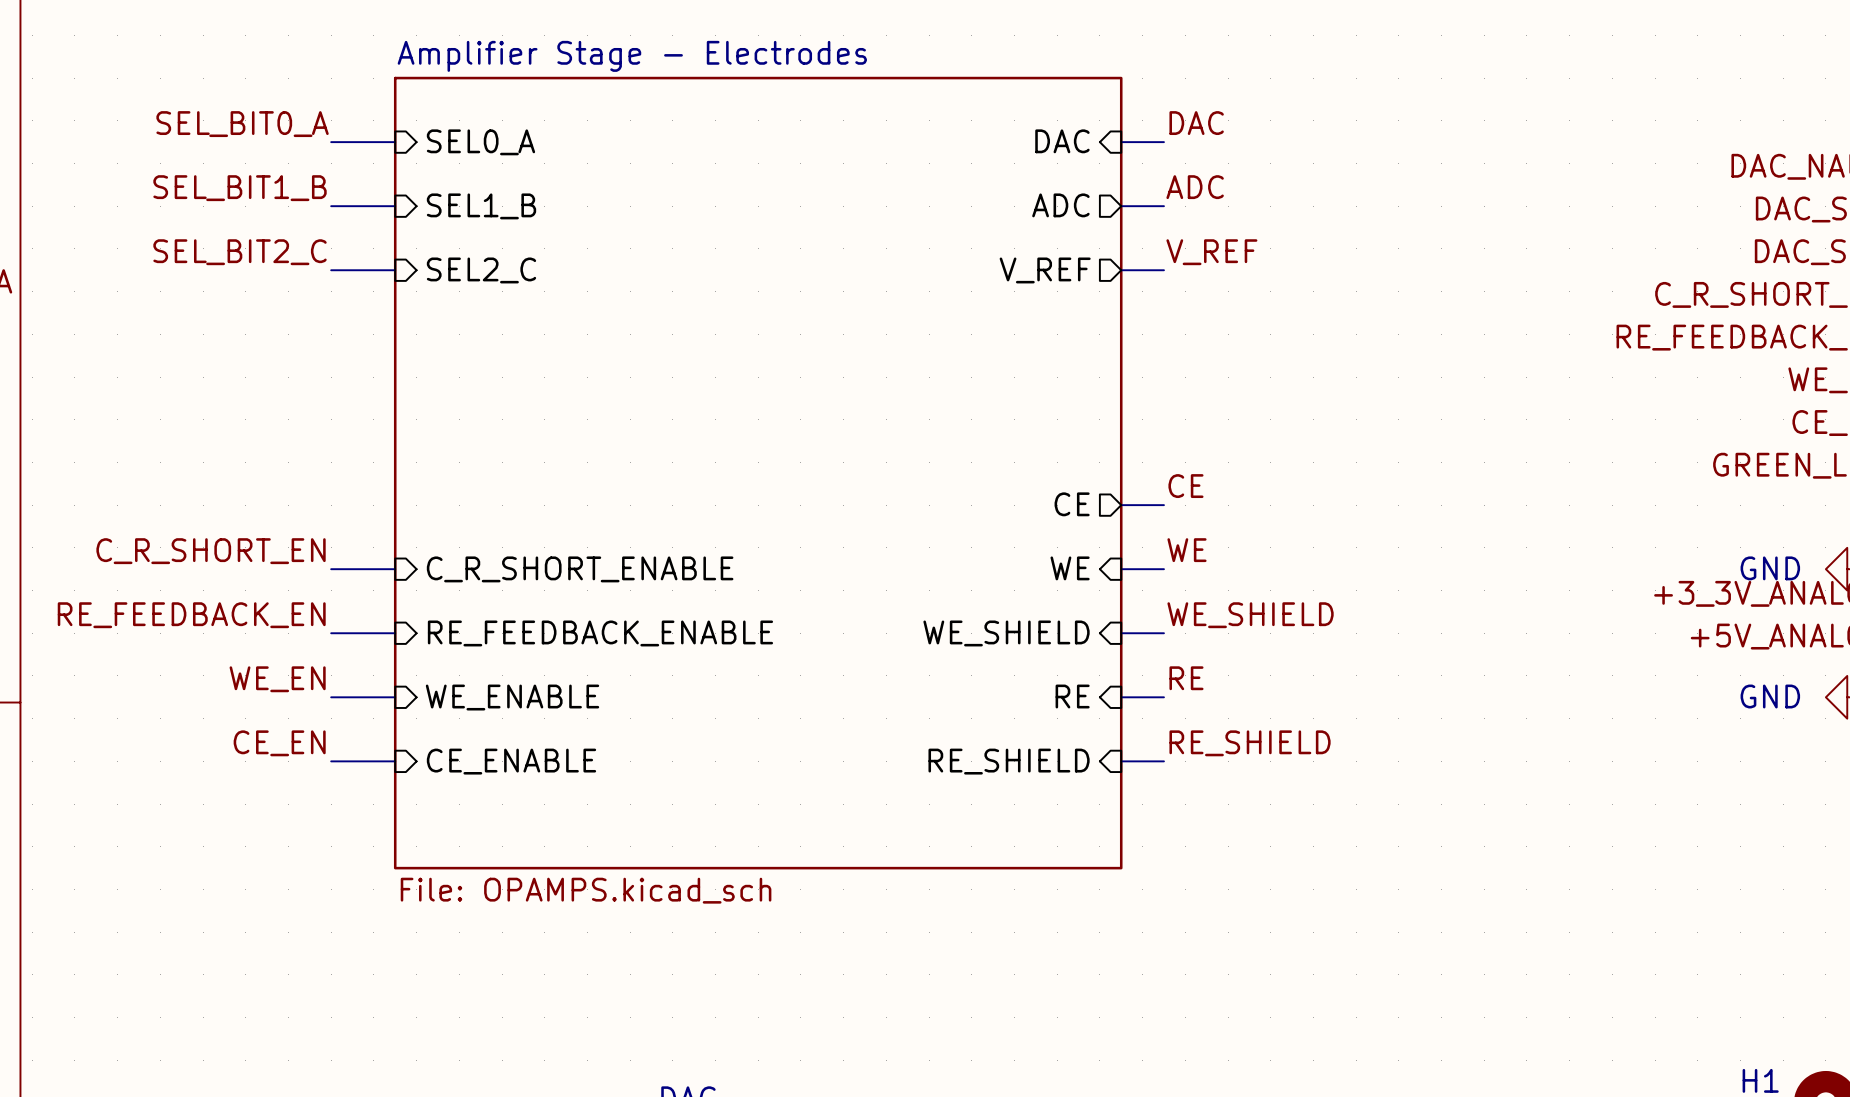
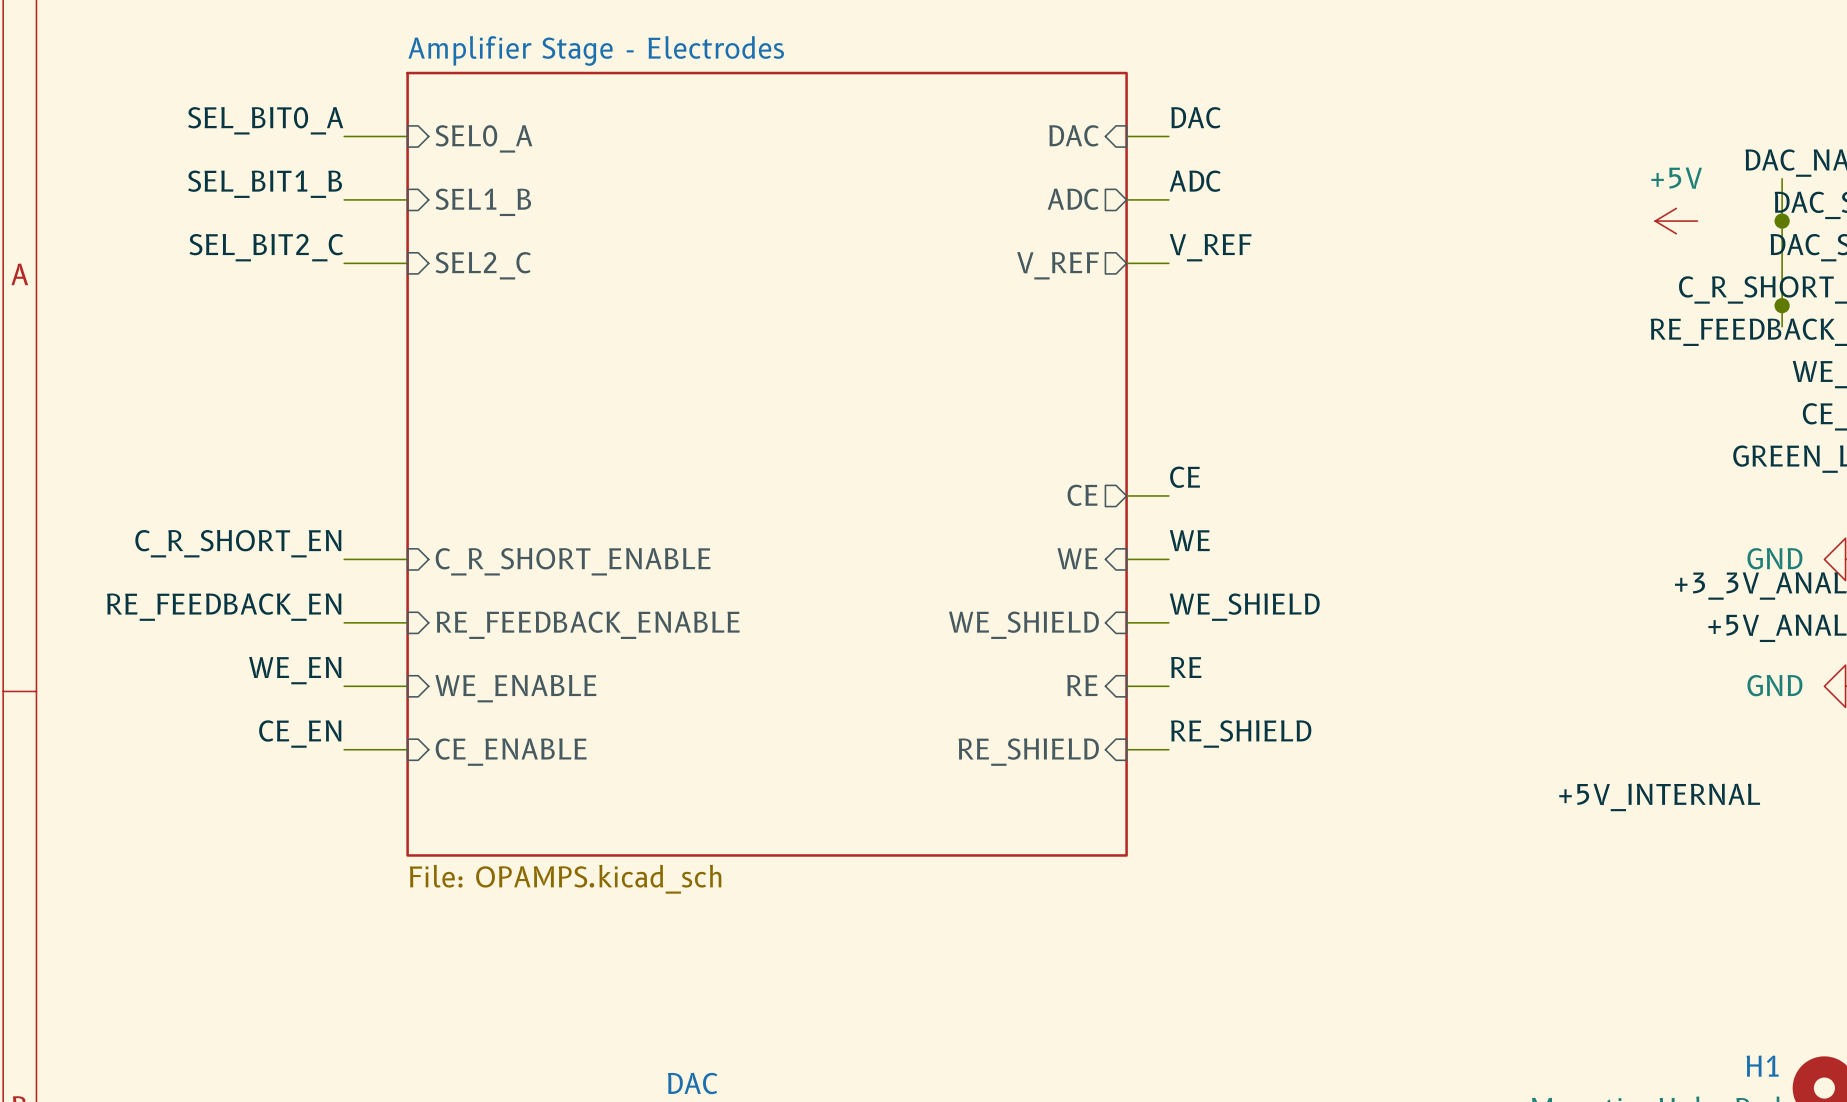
wire: none -> (1782, 178) (1782, 326)
power symbol: none -> +5V (1676, 221)
junction: none -> (1782, 221)
junction: none -> (1782, 305)
label: none -> +5V_INTERNAL (1659, 797)

